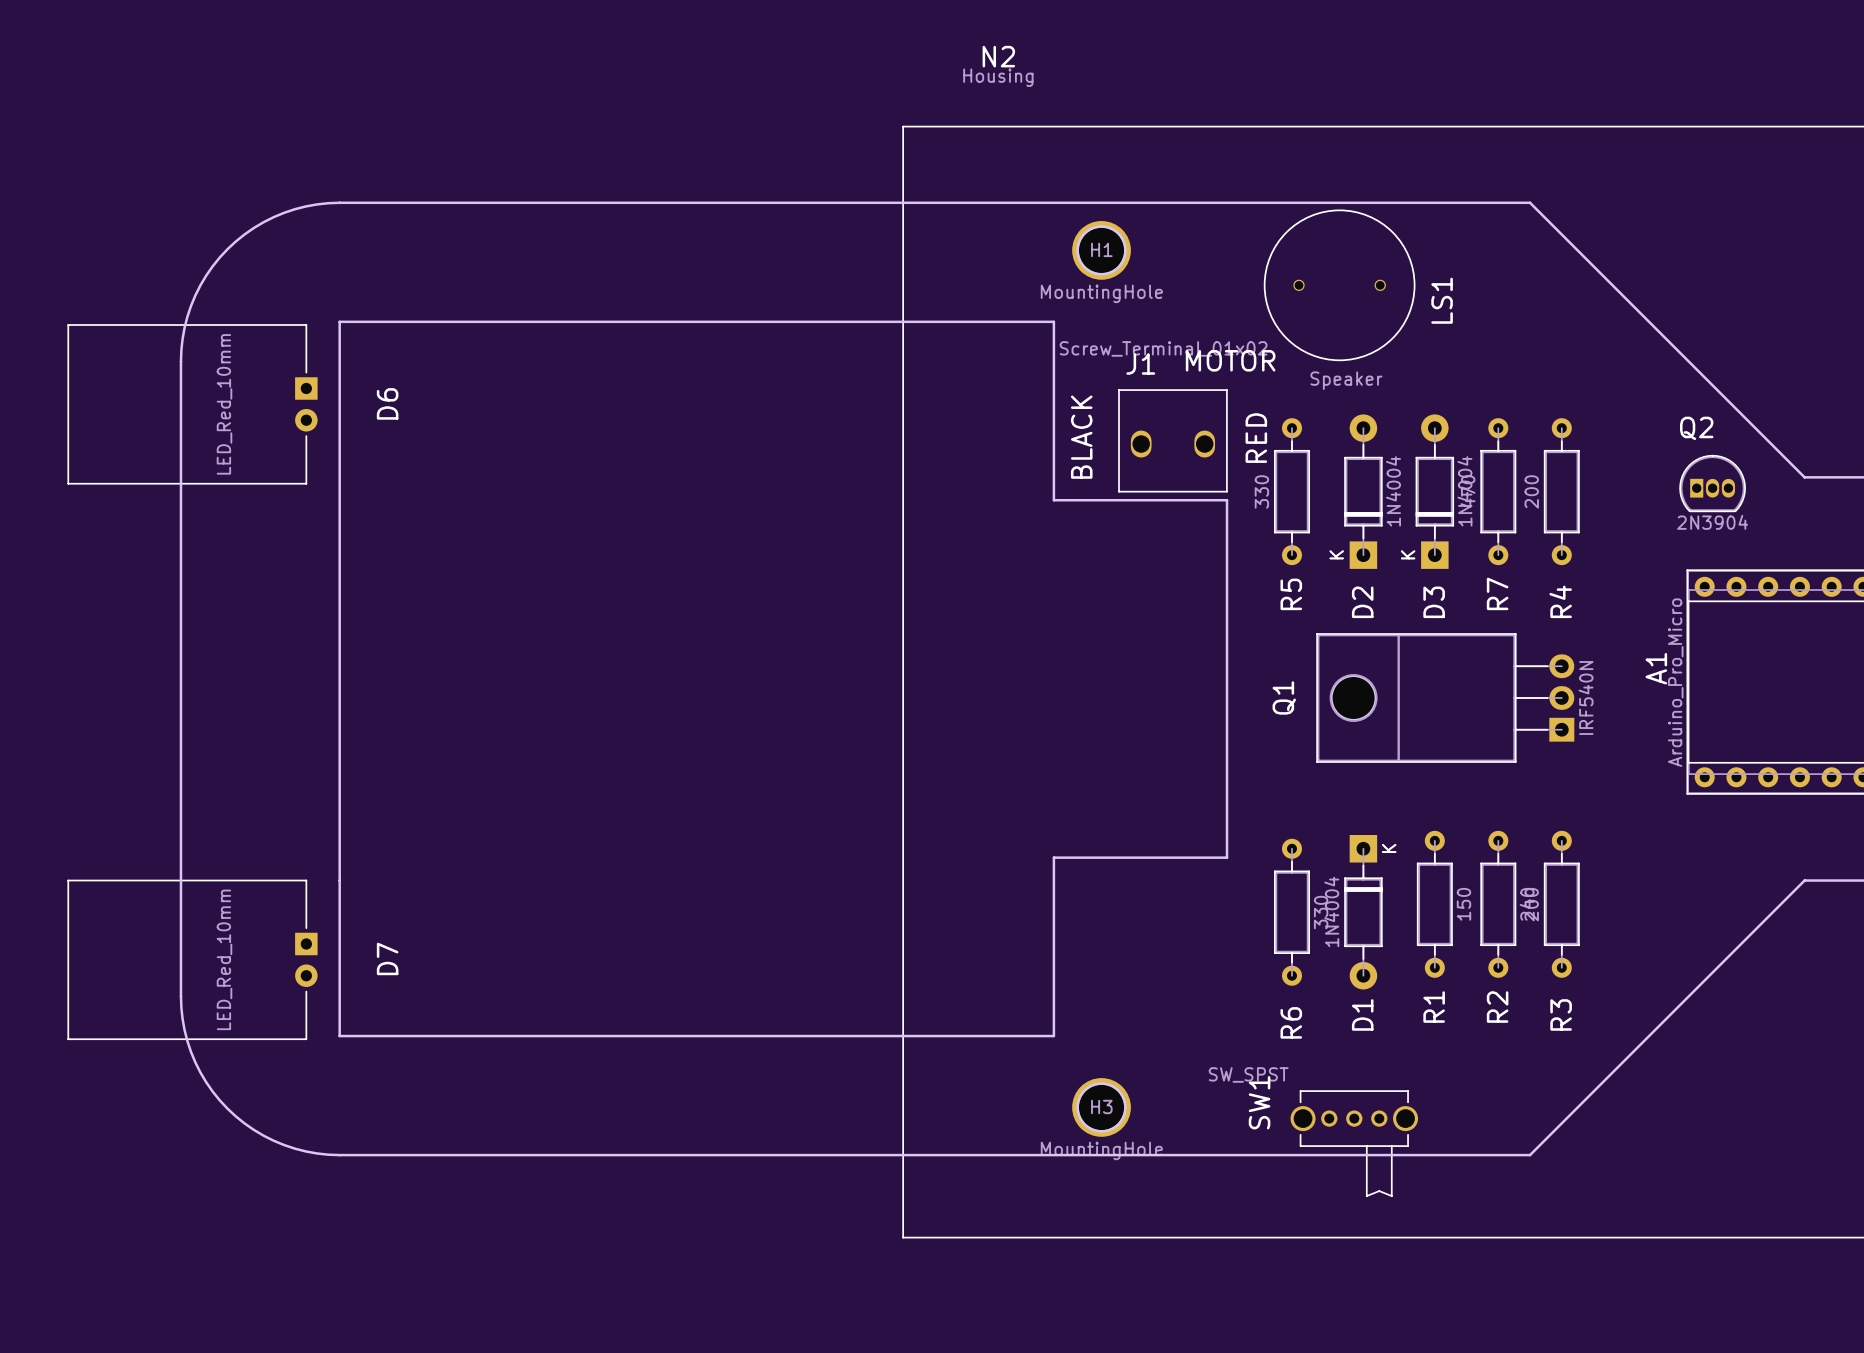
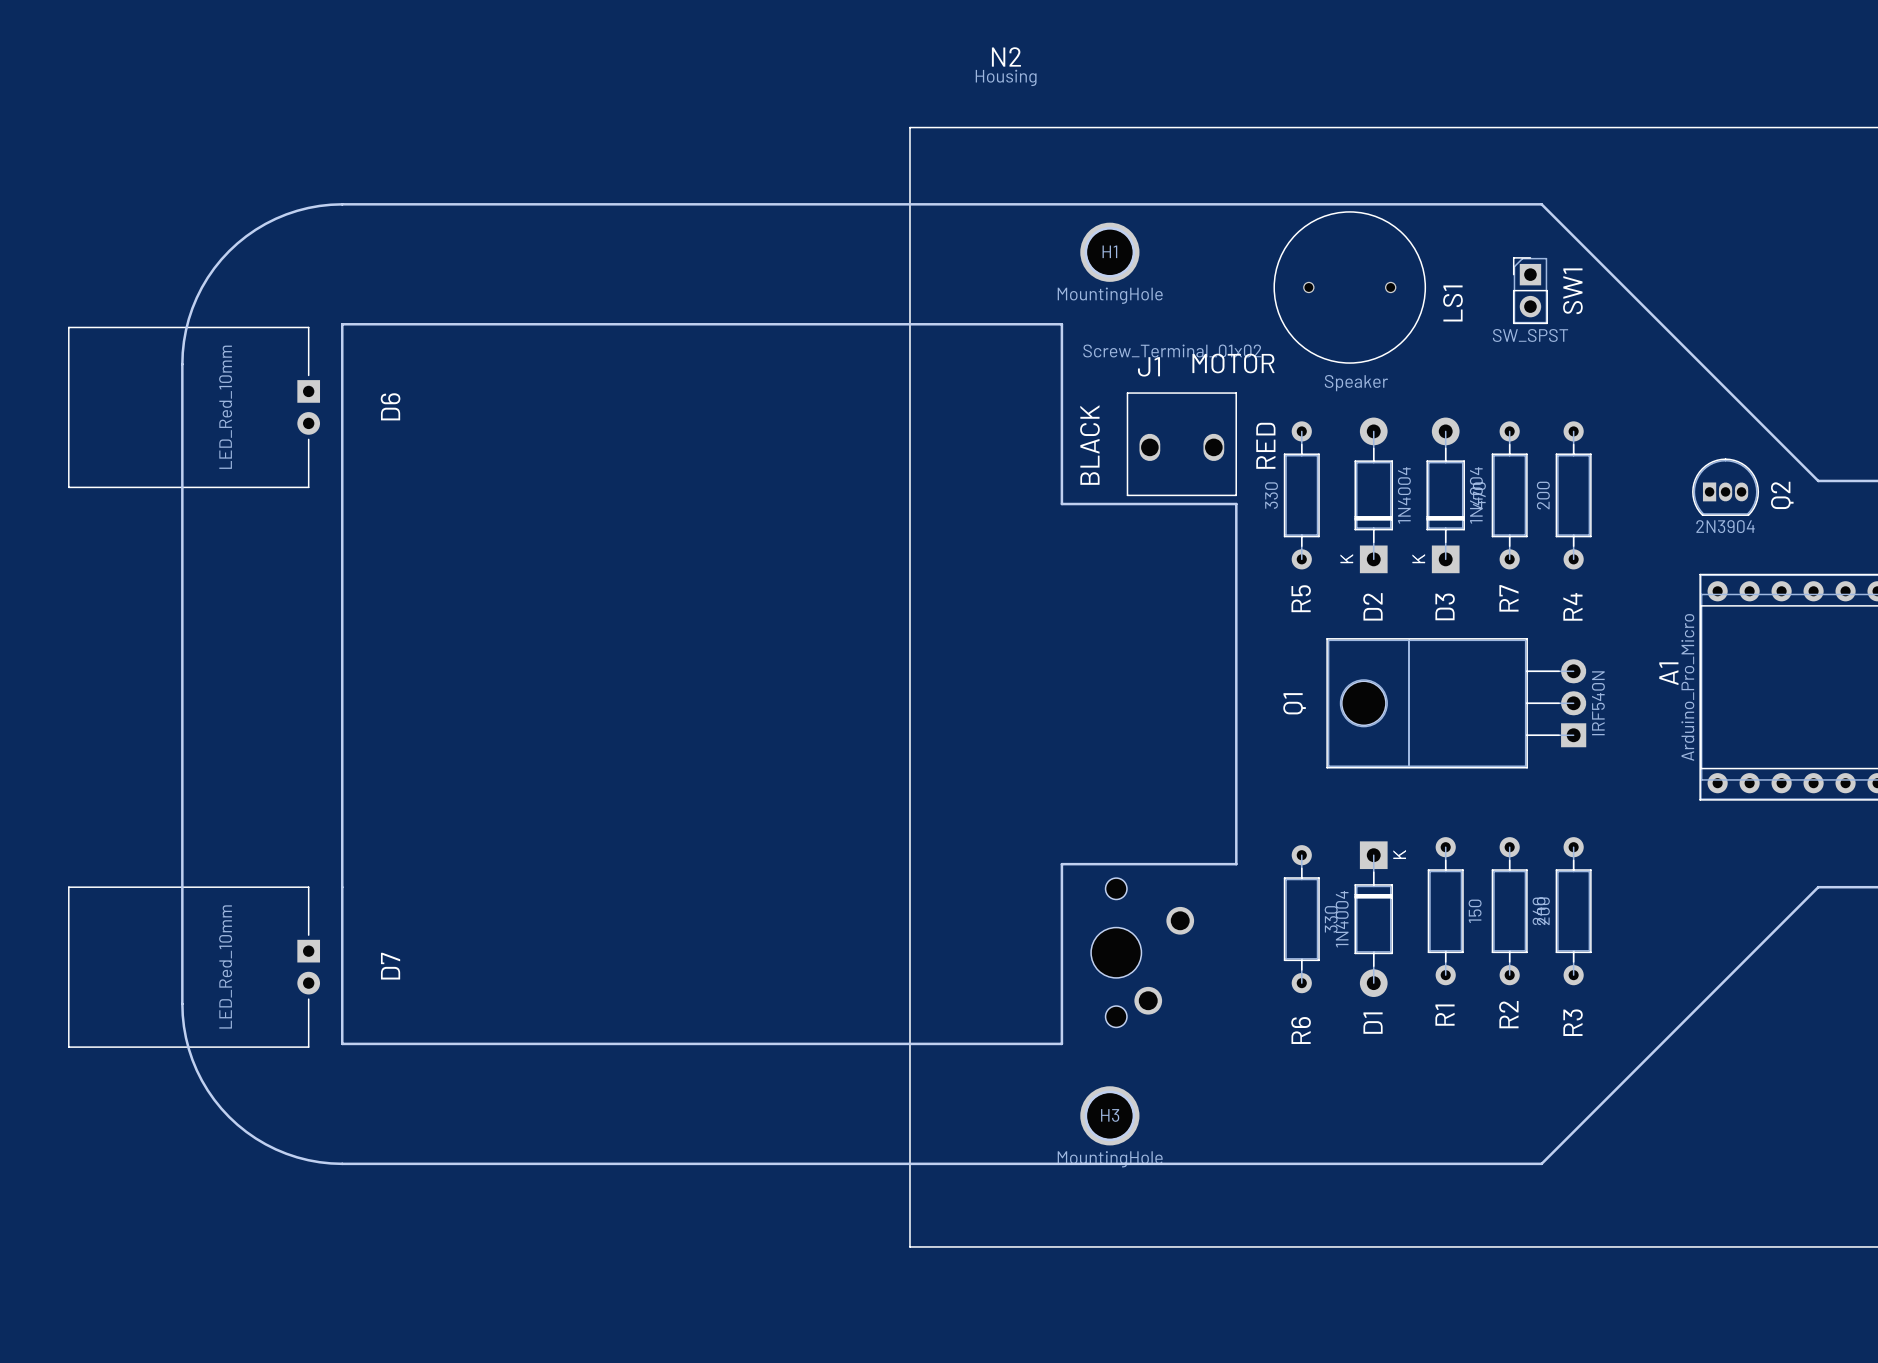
Q2 name rotation: 0° (1696, 428) -> 90° counterclockwise (1782, 495)
Q2 name position: Q2 (1696, 428) -> Q2 (1782, 495)
part: none -> (1142, 952)
SW1 value position: SW_SPST (1248, 1074) -> SW_SPST (1530, 335)
SW1 footprint: [1290, 1090, 1419, 1197] -> [1512, 257, 1548, 325]
SW1 name position: SW1 (1259, 1102) -> SW1 (1572, 291)

